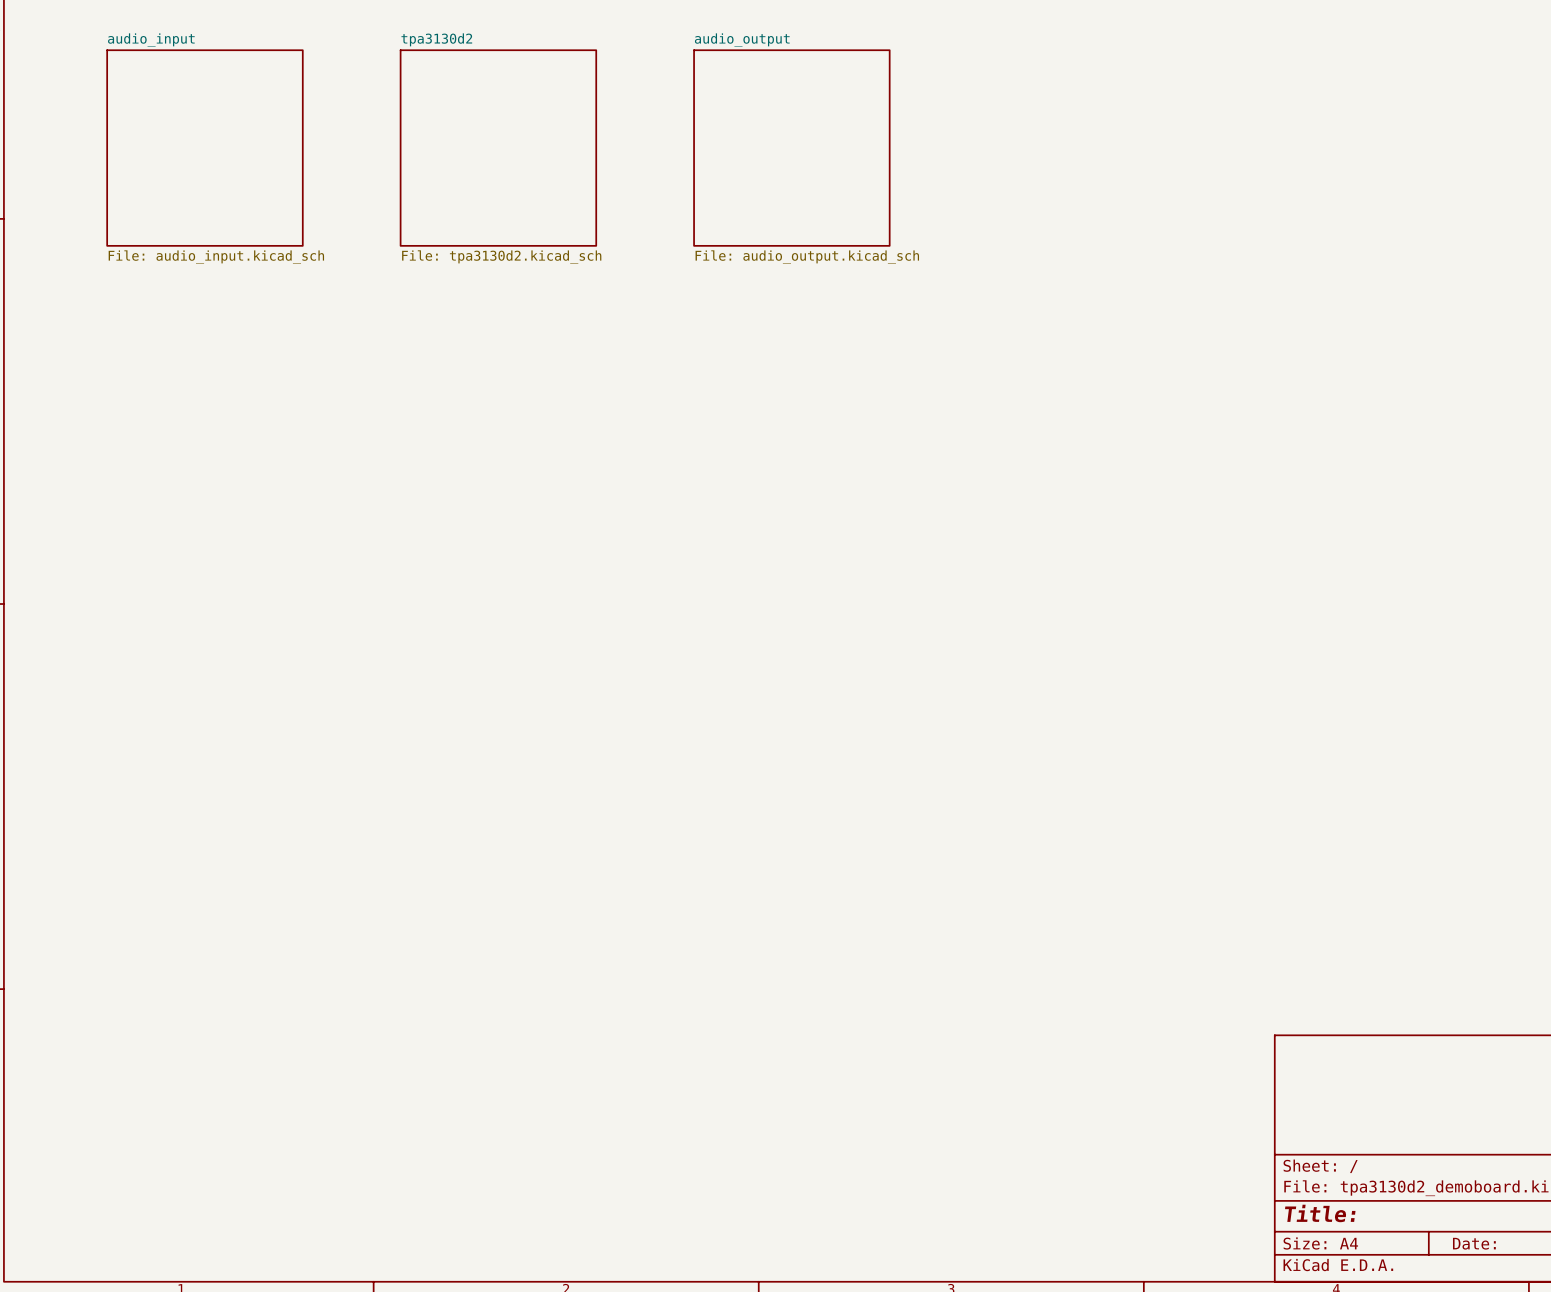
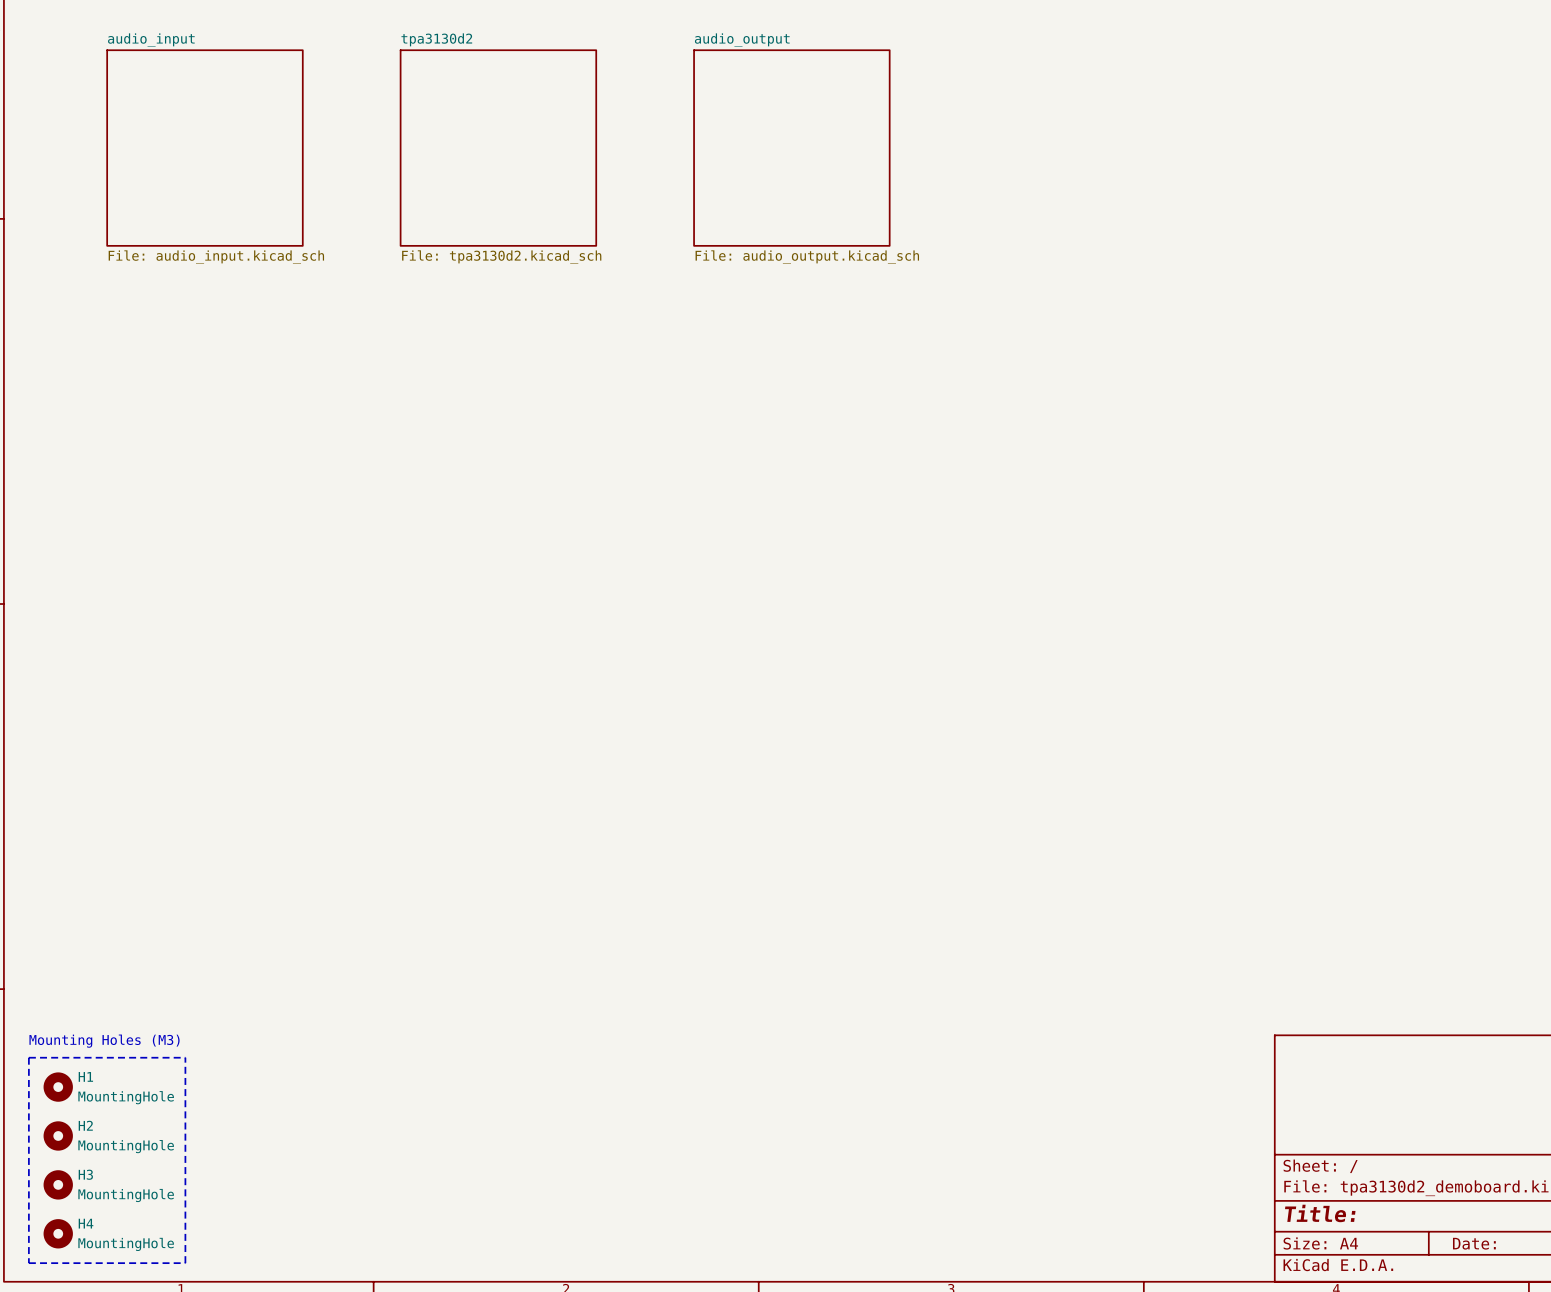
text: none -> Mounting Holes (M3) (104, 1041)
line: none -> (28, 1057) (185, 1057) (185, 1263) (28, 1263) (28, 1057)
H1: none -> MountingHole (58, 1087)
H2: none -> MountingHole (58, 1135)
H3: none -> MountingHole (58, 1184)
H4: none -> MountingHole (58, 1233)

